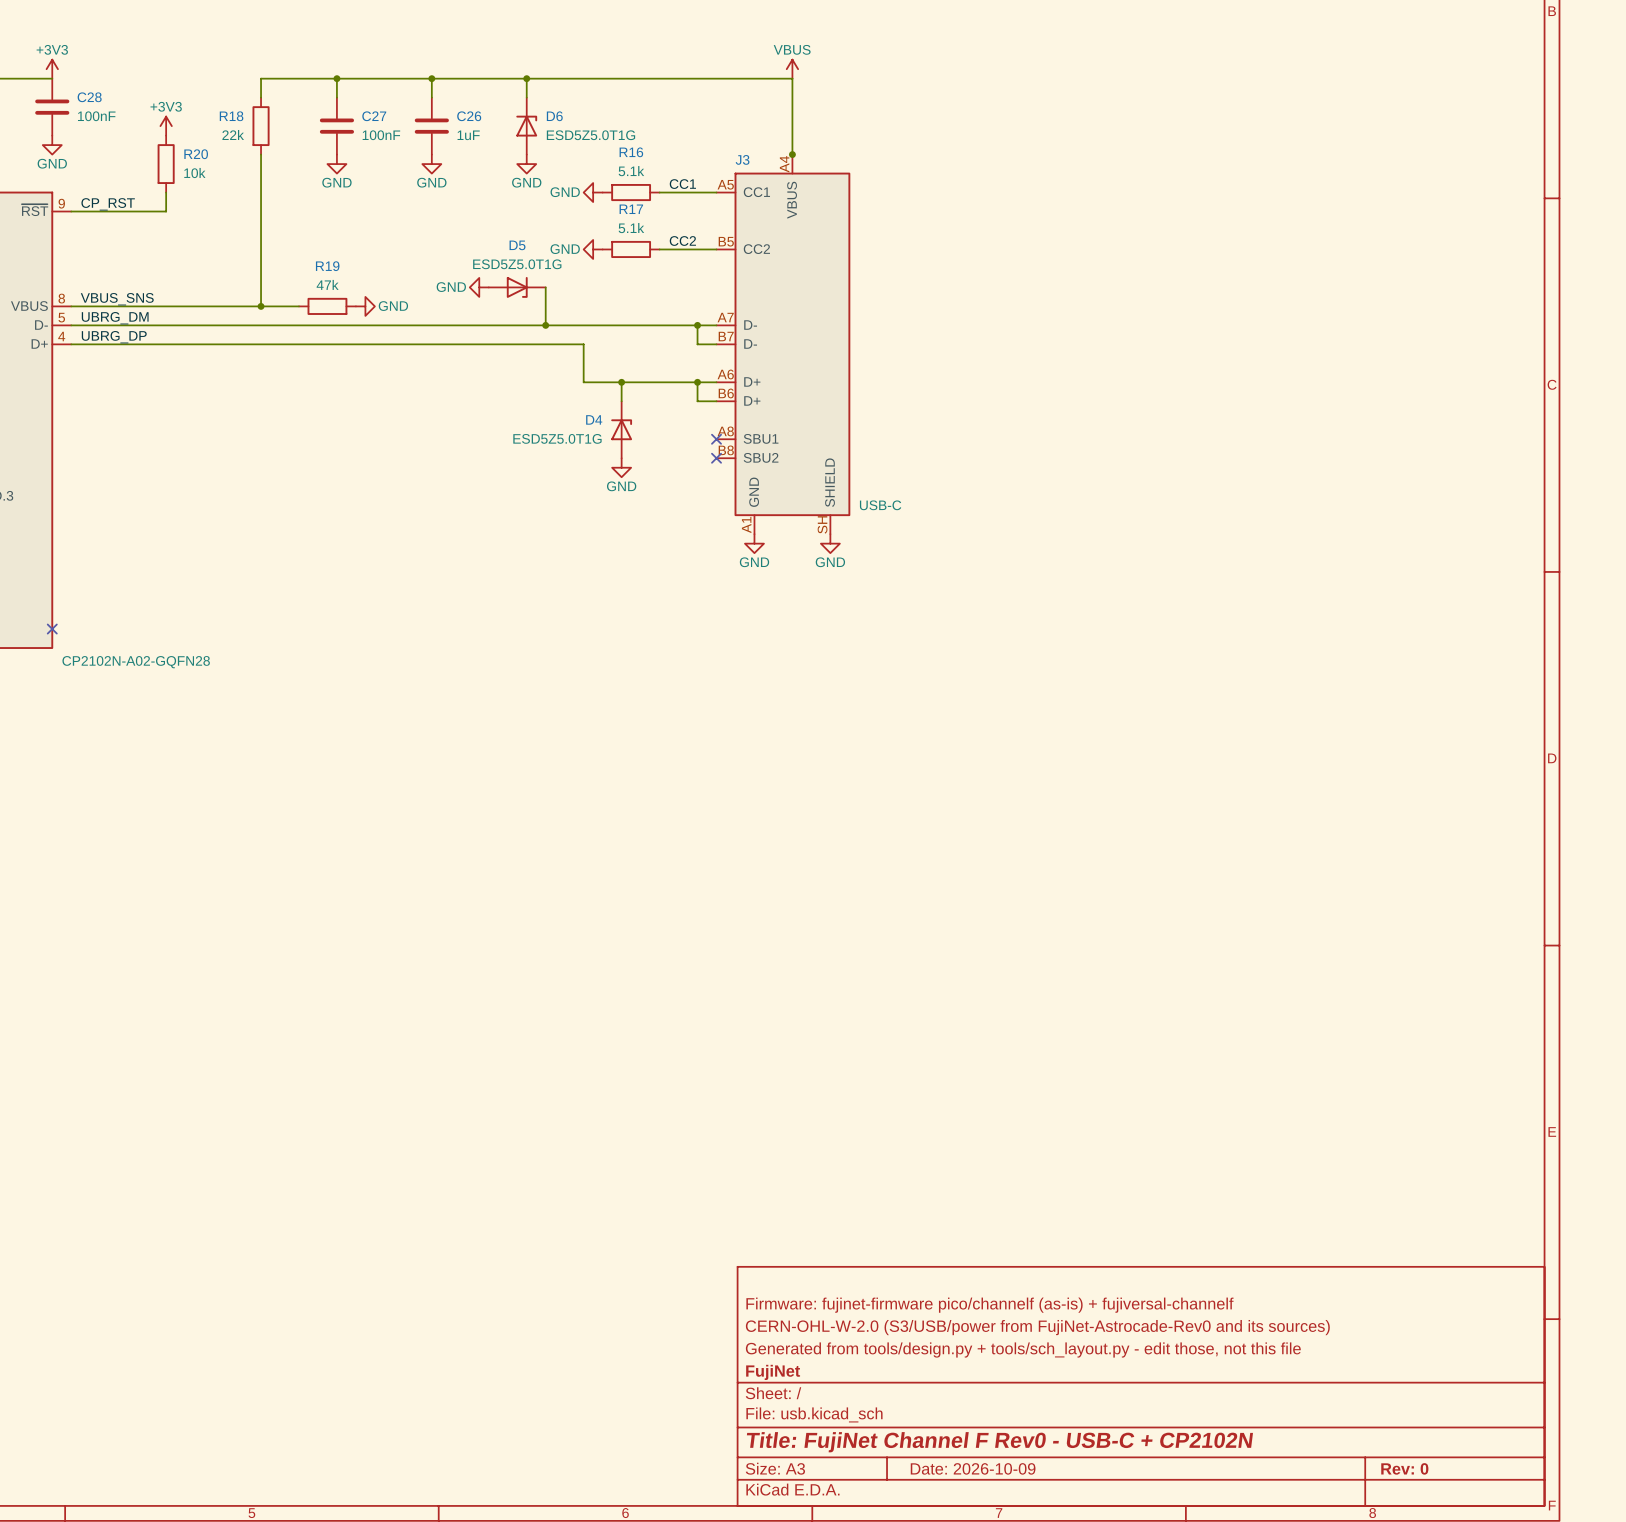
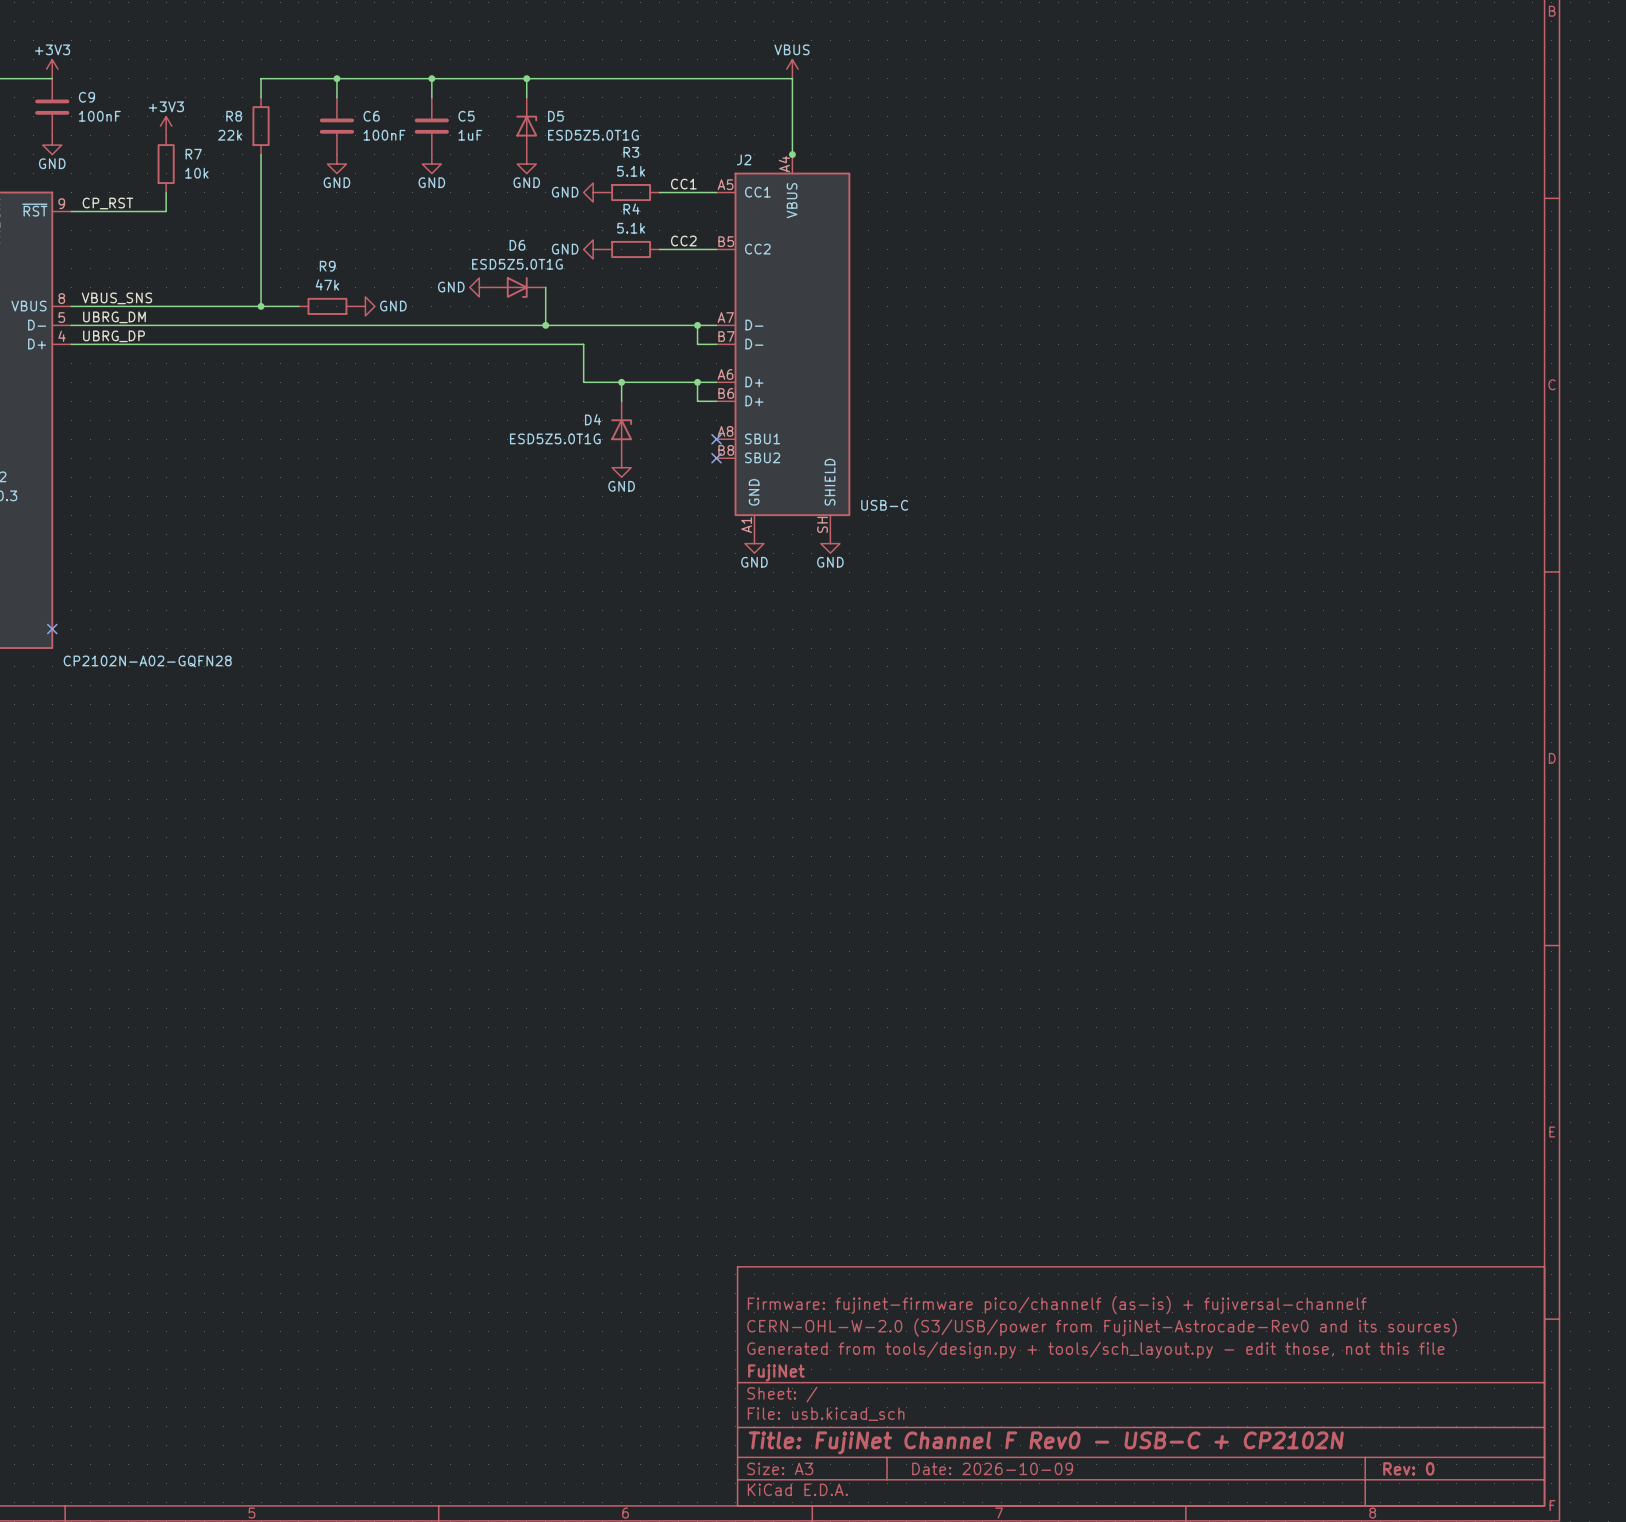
C28 name: C28 (89, 97) -> C9 (86, 97)
R18 name: R18 (231, 116) -> R8 (234, 116)
C27 name: C27 (374, 116) -> C6 (371, 116)
C26 name: C26 (469, 116) -> C5 (466, 116)
D6 name: D6 (554, 116) -> D5 (555, 116)
R16 name: R16 (631, 152) -> R3 (631, 152)
R20 name: R20 (196, 154) -> R7 (193, 154)
J3 name: J3 (742, 159) -> J2 (744, 159)
R17 name: R17 (631, 209) -> R4 (631, 209)
D5 name: D5 (517, 245) -> D6 (517, 245)
R19 name: R19 (327, 266) -> R9 (327, 266)

